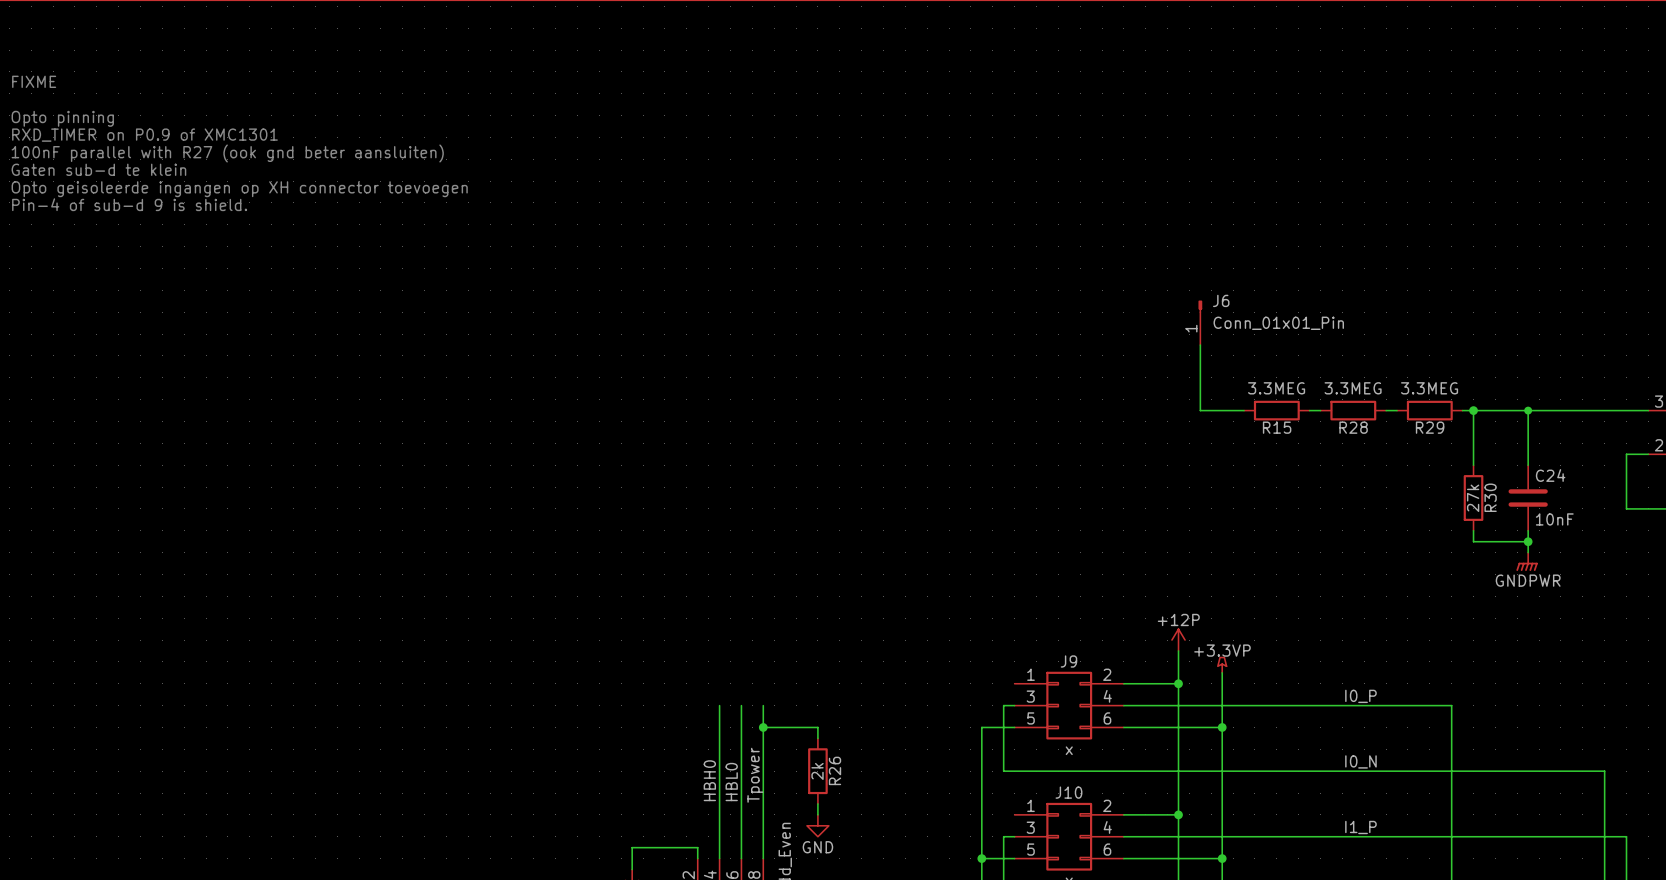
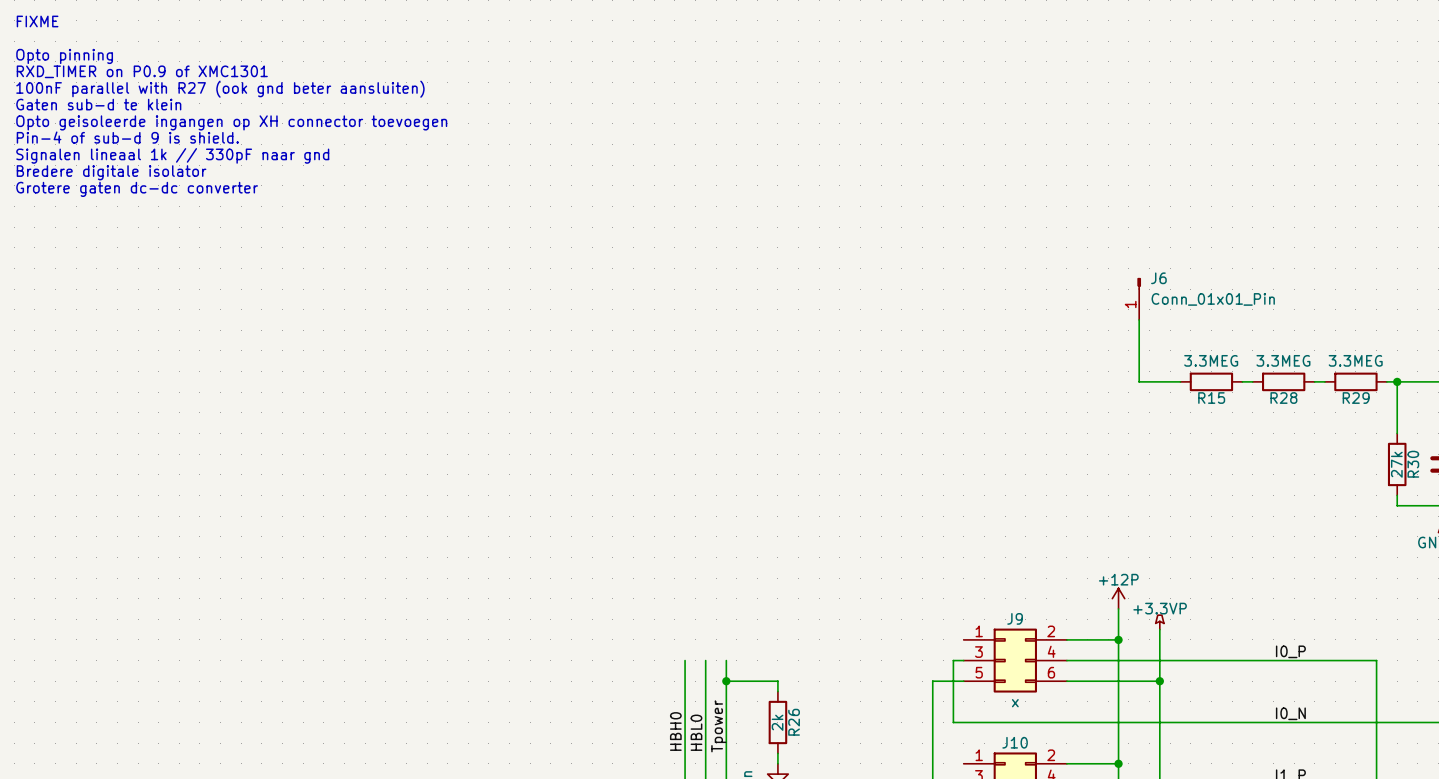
text: none -> FIXME (37, 21)
text: none -> Opto pinning (64, 56)
text: FIXME (34, 81) -> RXD_TIMER on P0.9 of XMC1301 (142, 71)
text: none -> 100nF parallel with R27 (ook gnd beter aansluiten) (220, 89)
text: Opto pinning (62, 118) -> Gaten sub-d te klein (98, 104)
text: RXD_TIMER on P0.9 of XMC1301 (144, 135) -> Opto geisoleerde ingangen op XH connector toevoegen (231, 122)
text: 100nF parallel with R27 (ook gnd beter aansluiten) (227, 153) -> Pin-4 of sub-d 9 is shield. (127, 137)
text: Gaten sub-d te klein (98, 169) -> Signalen lineaal 1k // 330pF naar gnd (172, 155)
text: Opto geisoleerde ingangen op XH connector toevoegen (239, 189) -> Bredere digitale isolator (111, 172)
text: Pin-4 of sub-d 9 is shield. (129, 204) -> Grotere gaten dc-dc converter (137, 189)

